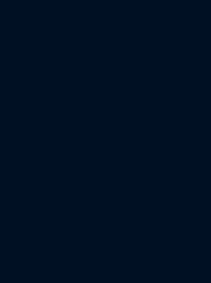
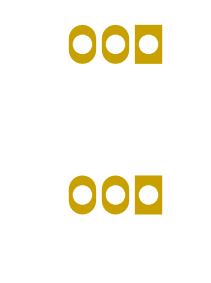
part: none -> (115, 44)
part: none -> (115, 194)

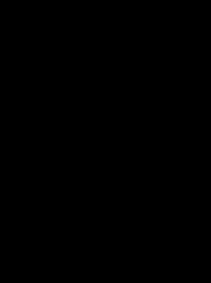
part: (115, 44) -> none
part: (115, 194) -> none

